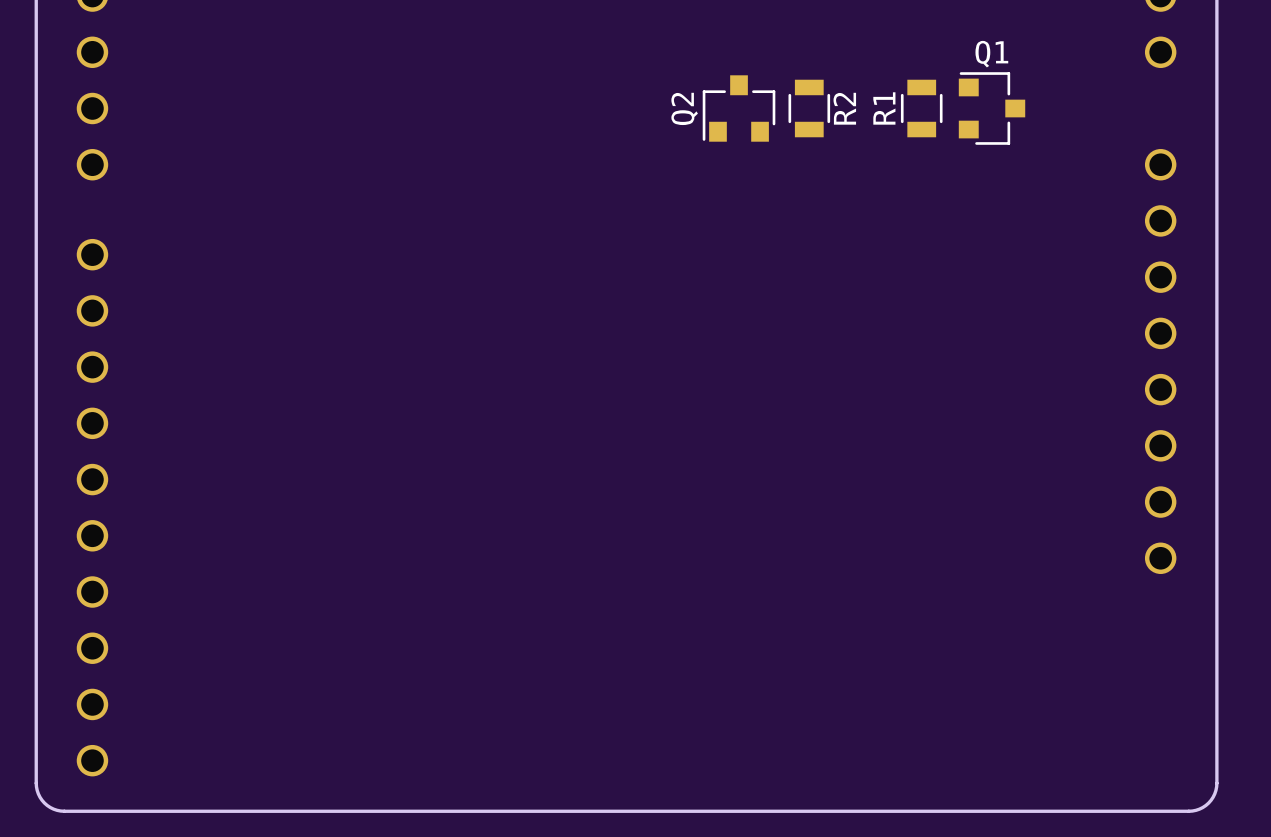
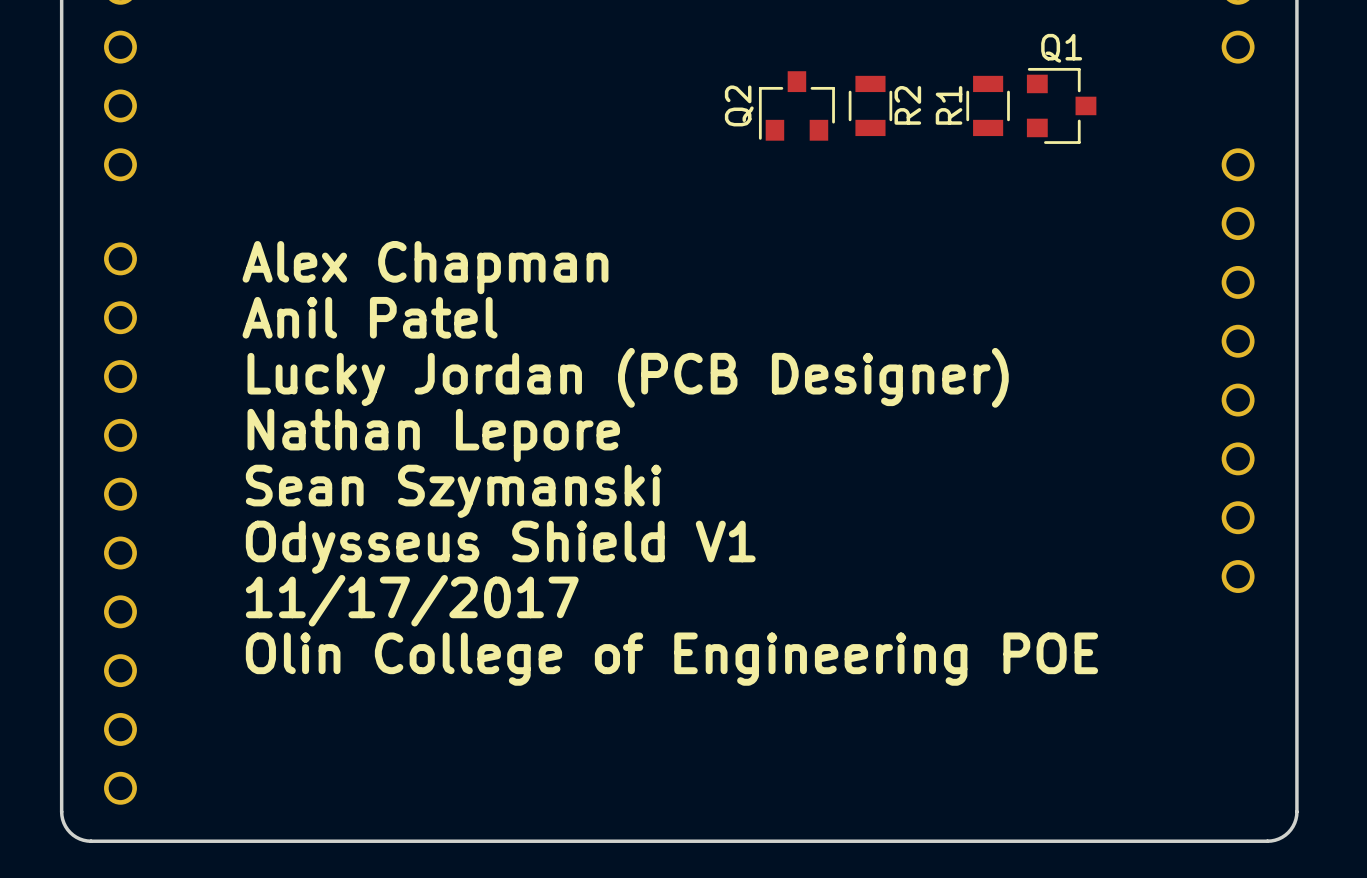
text: none -> Alex Chapman (425, 267)
text: none -> Anil Patel (370, 317)
text: none -> Lucky Jordan (PCB Designer) (628, 377)
text: none -> Nathan Lepore (433, 435)
text: none -> Sean Szymanski (453, 491)
text: none -> Odysseus Shield V1 (500, 547)
text: none -> 11/17/2017 (412, 600)
text: none -> Olin College of Engineering POE (671, 659)

